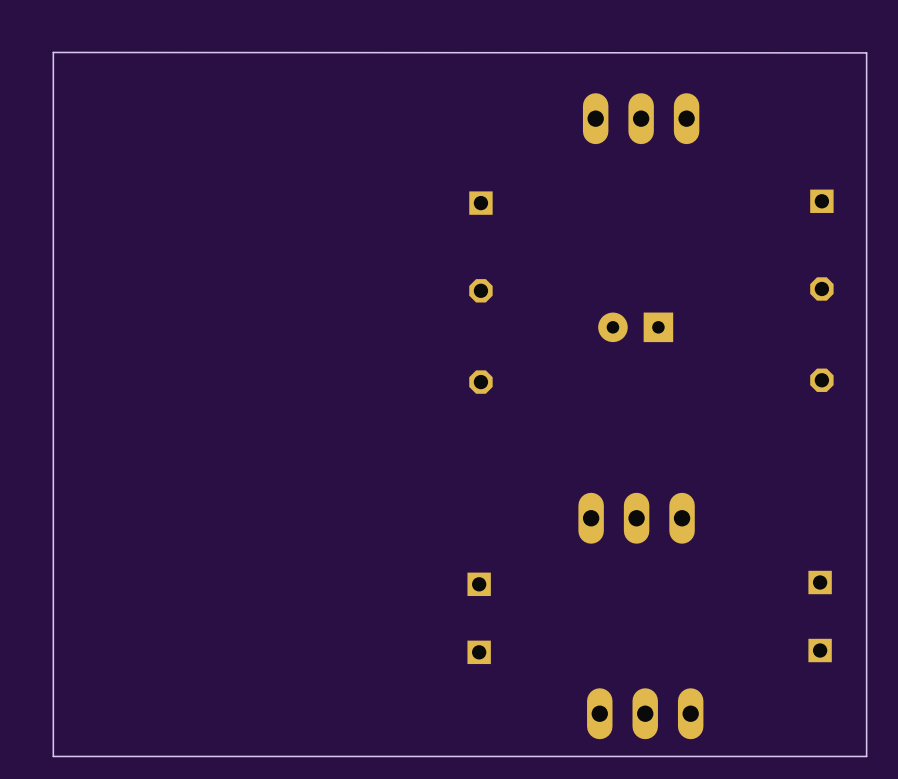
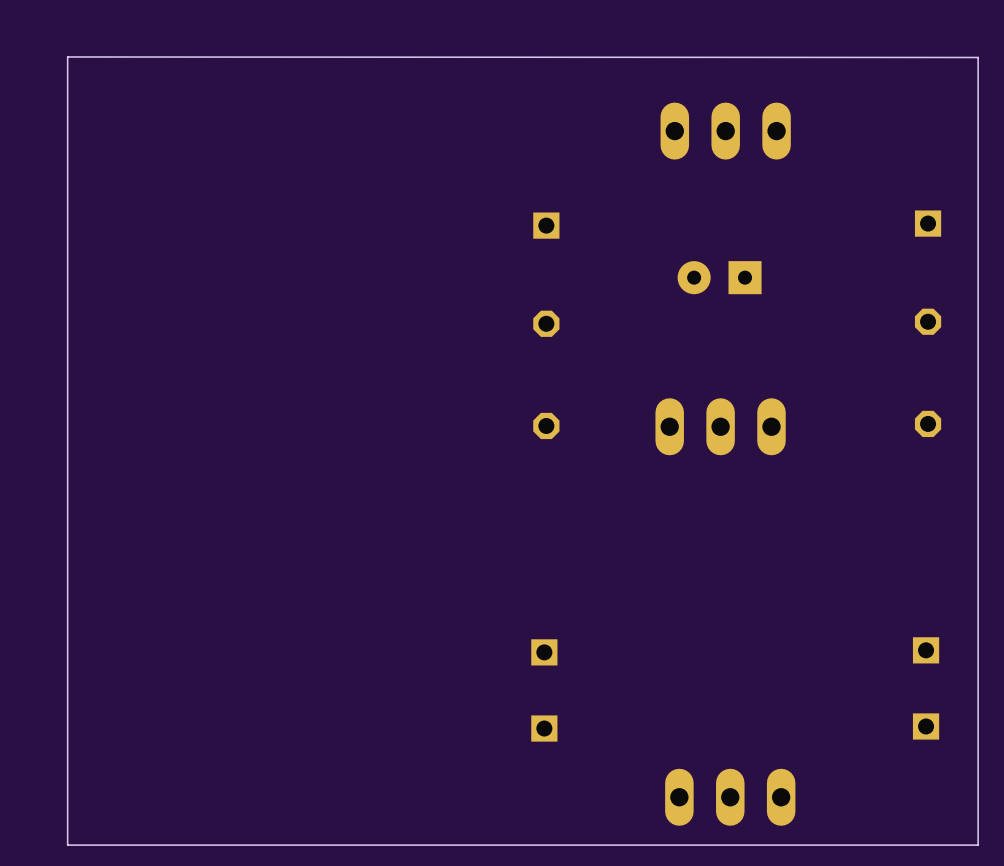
part position: (635, 327) -> (719, 277)
part position: (636, 518) -> (720, 426)

